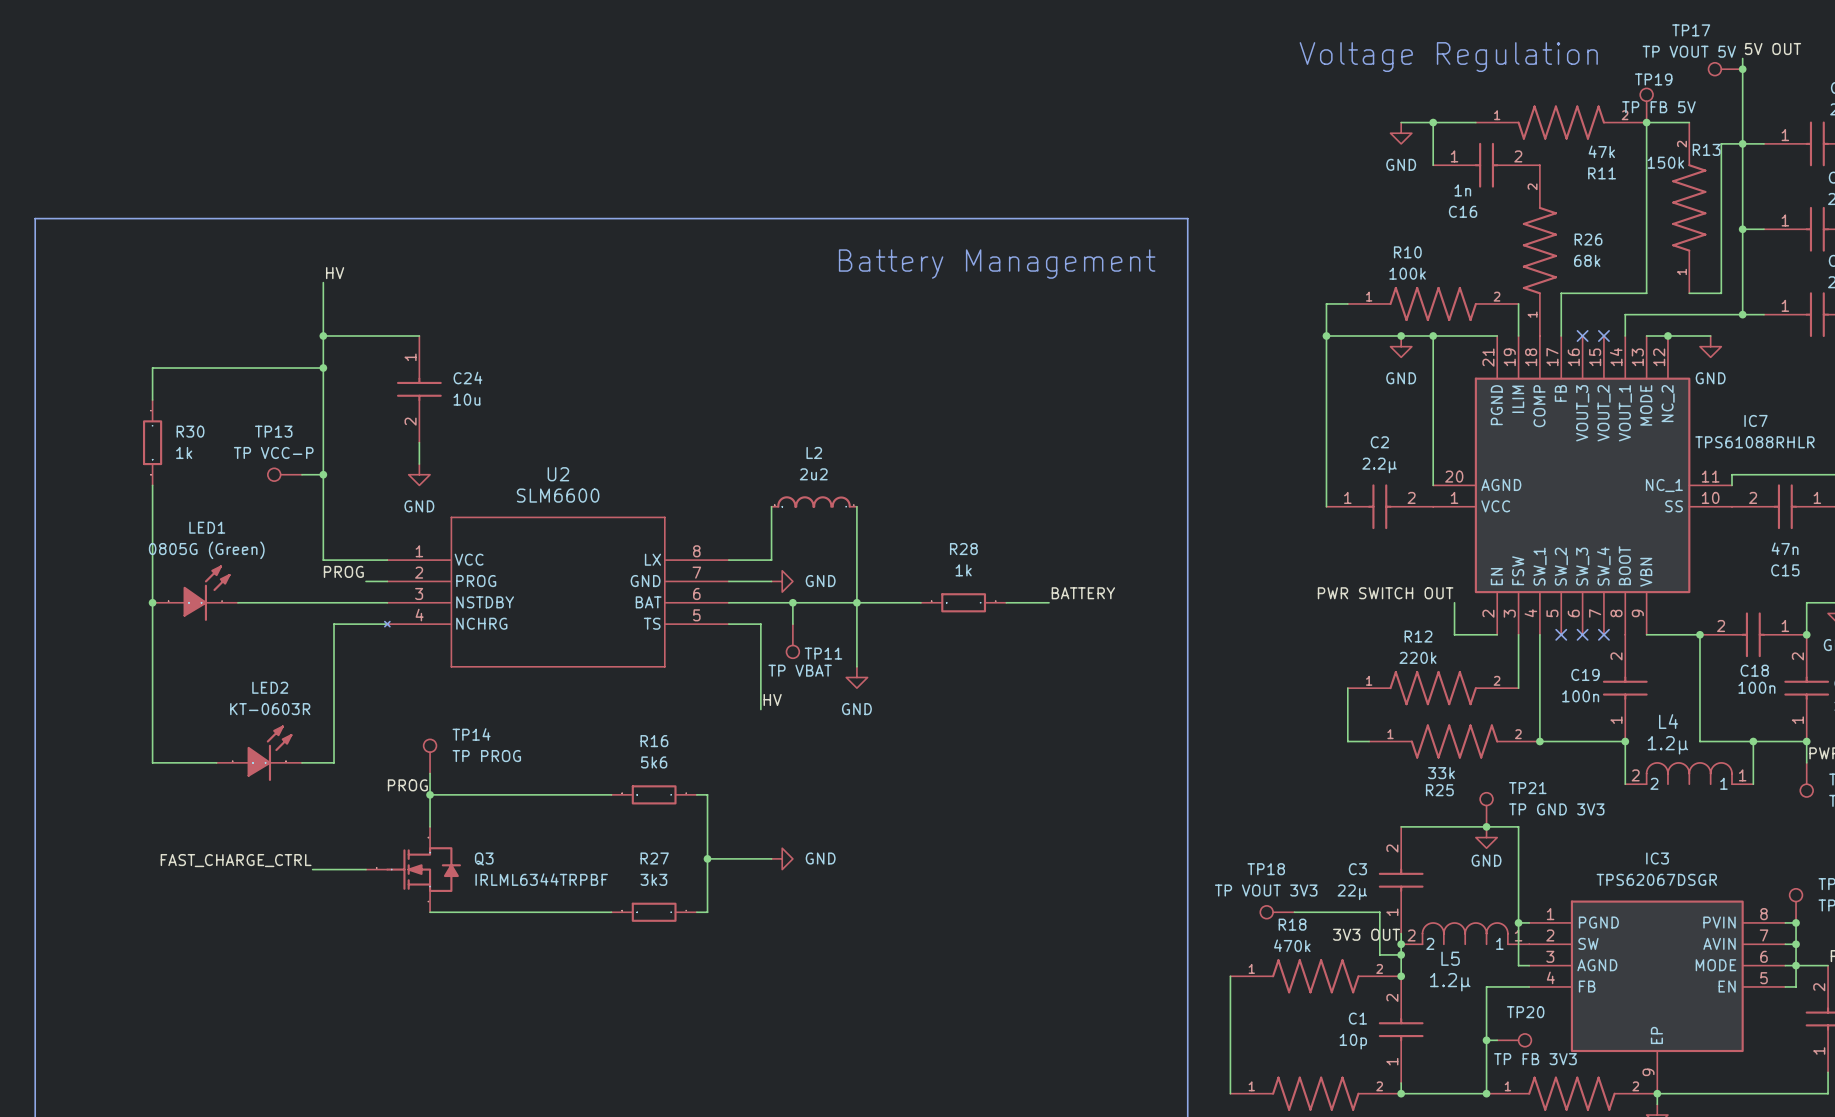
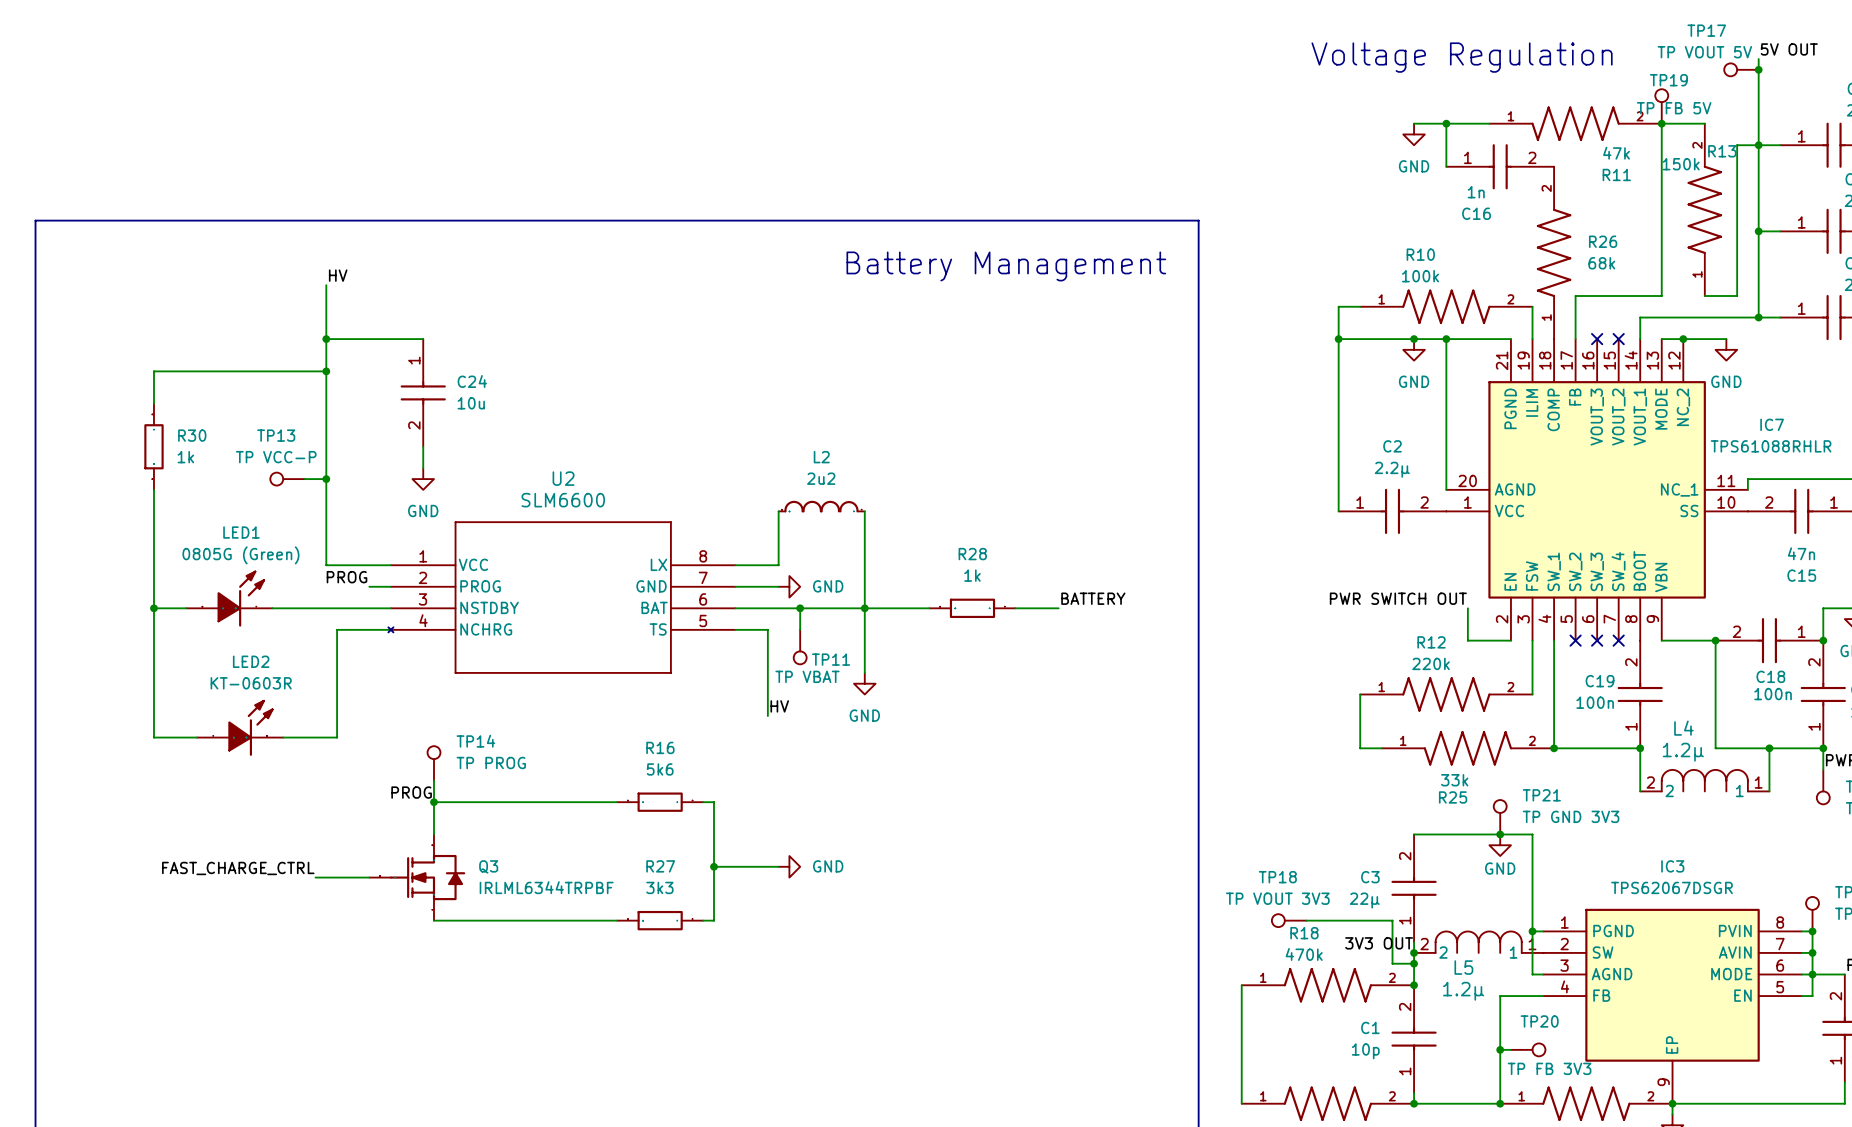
LED1 position: (195, 593) -> (229, 598)
wire: (152, 730) (152, 762) (216, 762) -> (153, 737) (197, 737)
wire: (334, 730) (334, 762) (301, 762) -> (337, 737) (283, 737)
LED2 position: (259, 753) -> (240, 727)

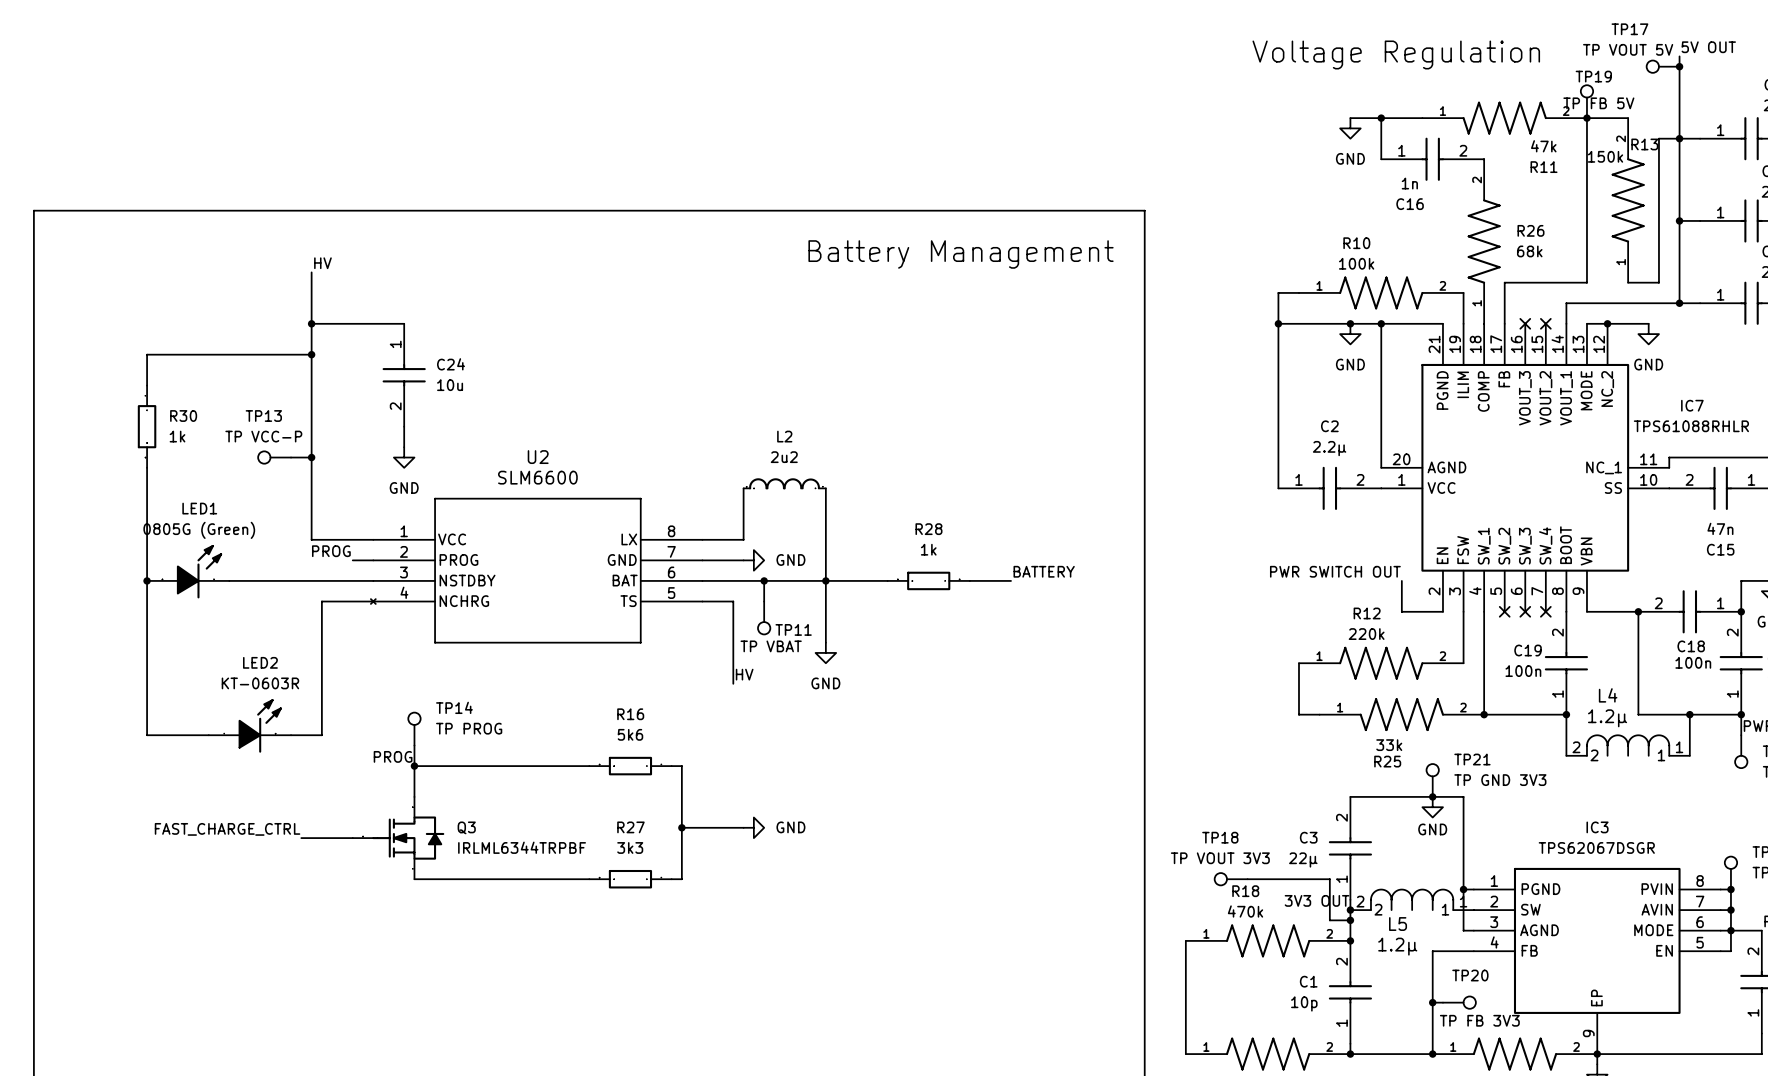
LED1 position: (229, 598) -> (188, 571)
LED2 position: (240, 727) -> (249, 725)
wire: (153, 737) (197, 737) -> (147, 704) (147, 735) (208, 735)
wire: (283, 737) (337, 737) -> (291, 735) (321, 735) (321, 704)

